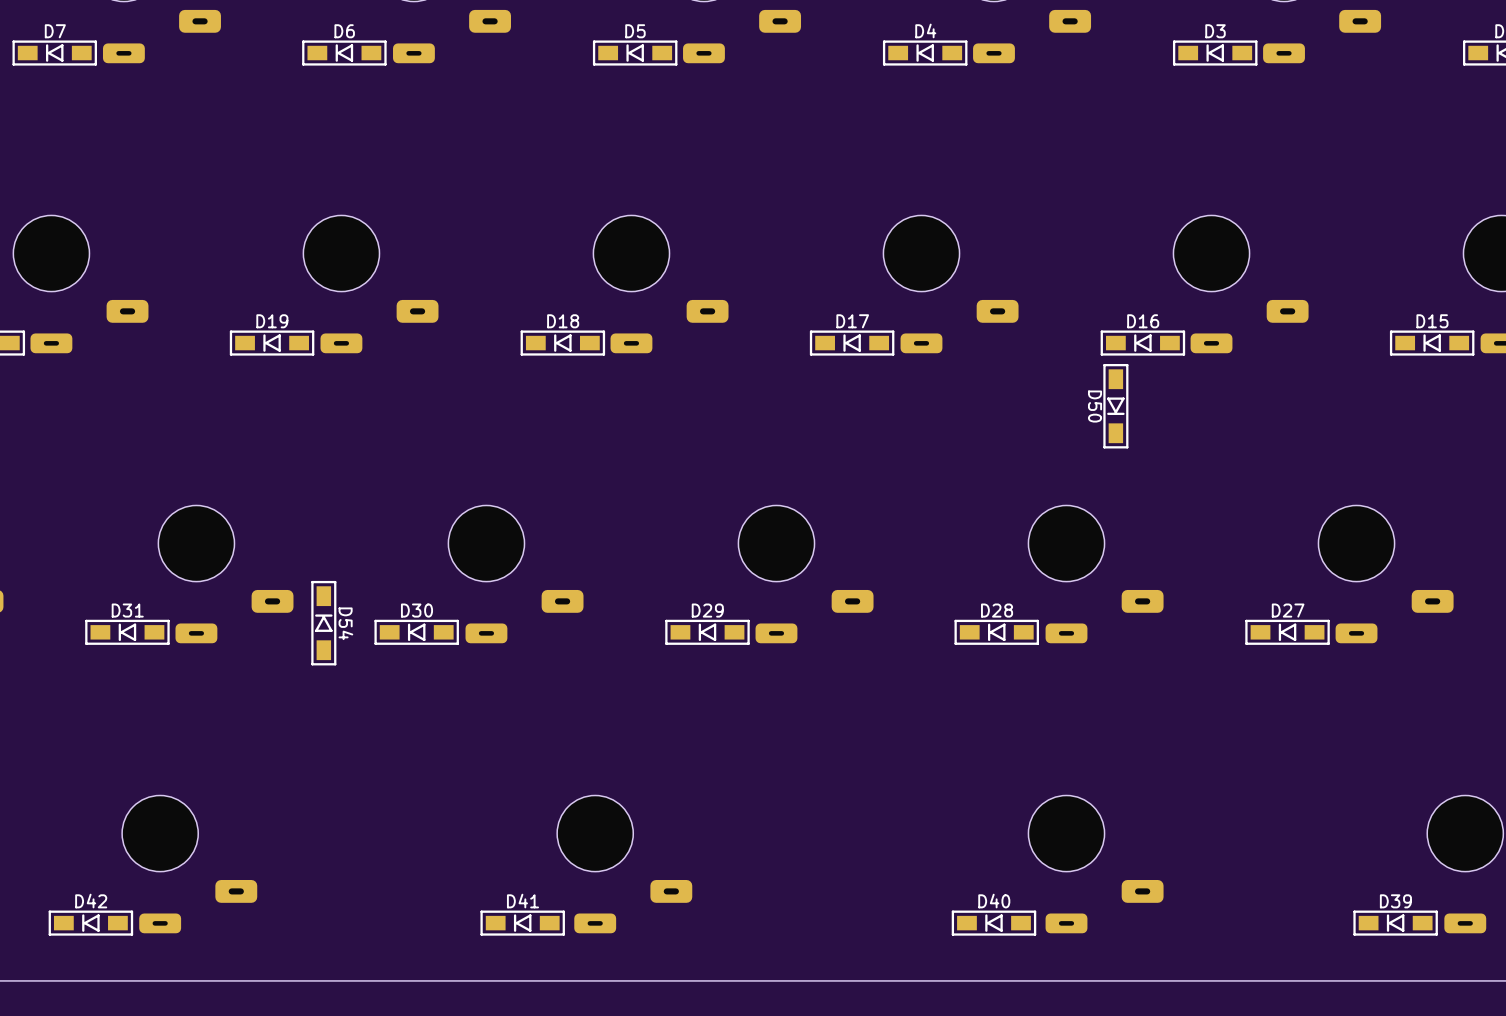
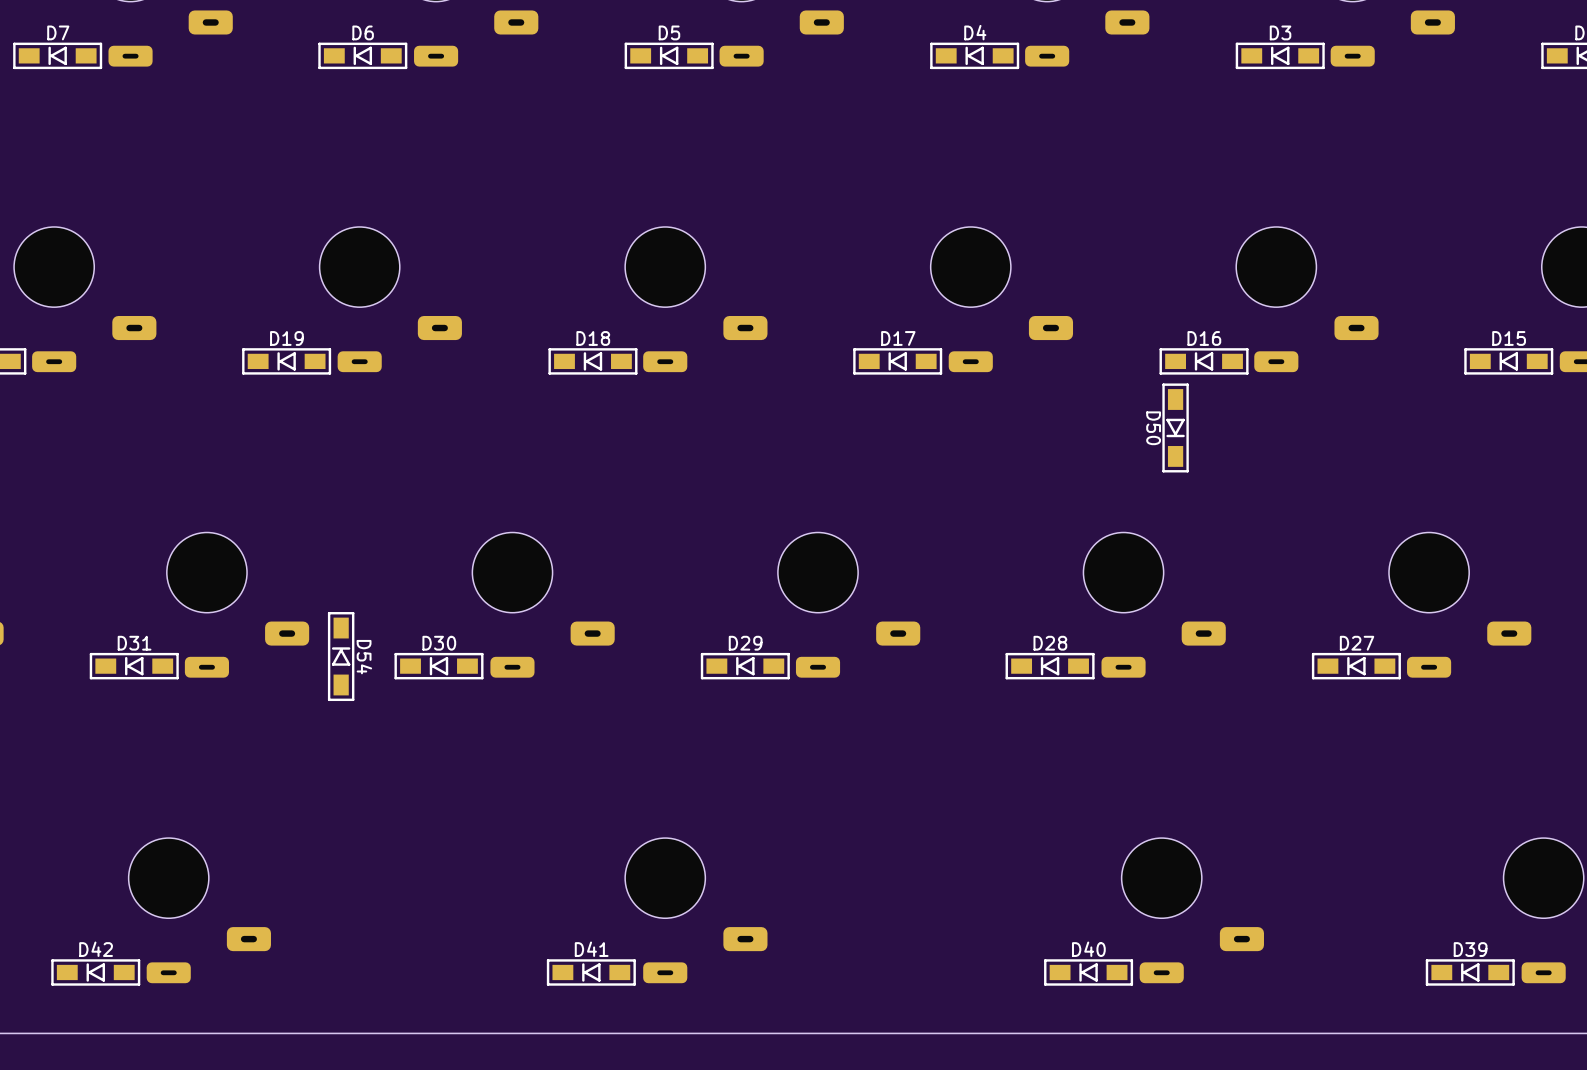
part position: (624, 864) -> (696, 910)
part position: (1095, 864) -> (1192, 910)
D41 position: (522, 923) -> (591, 972)
D40 position: (993, 923) -> (1088, 972)

